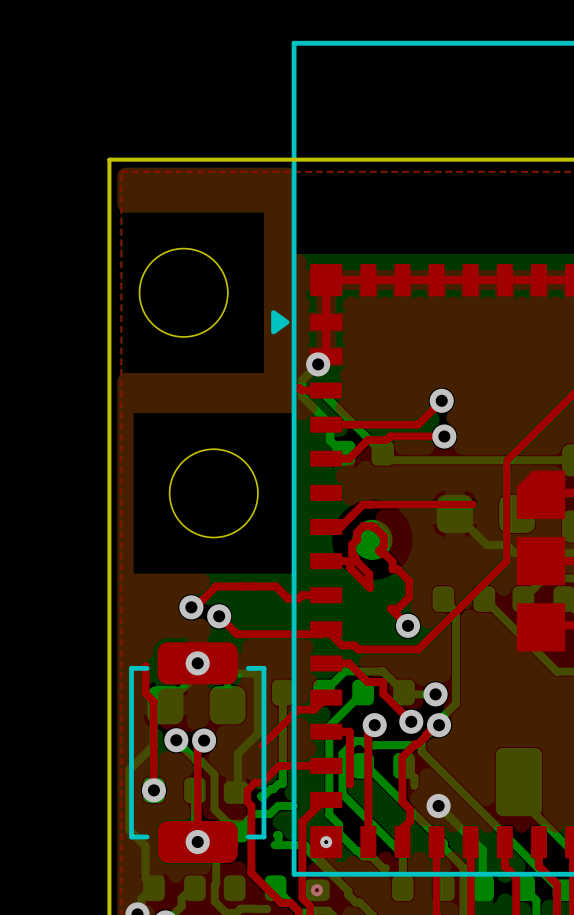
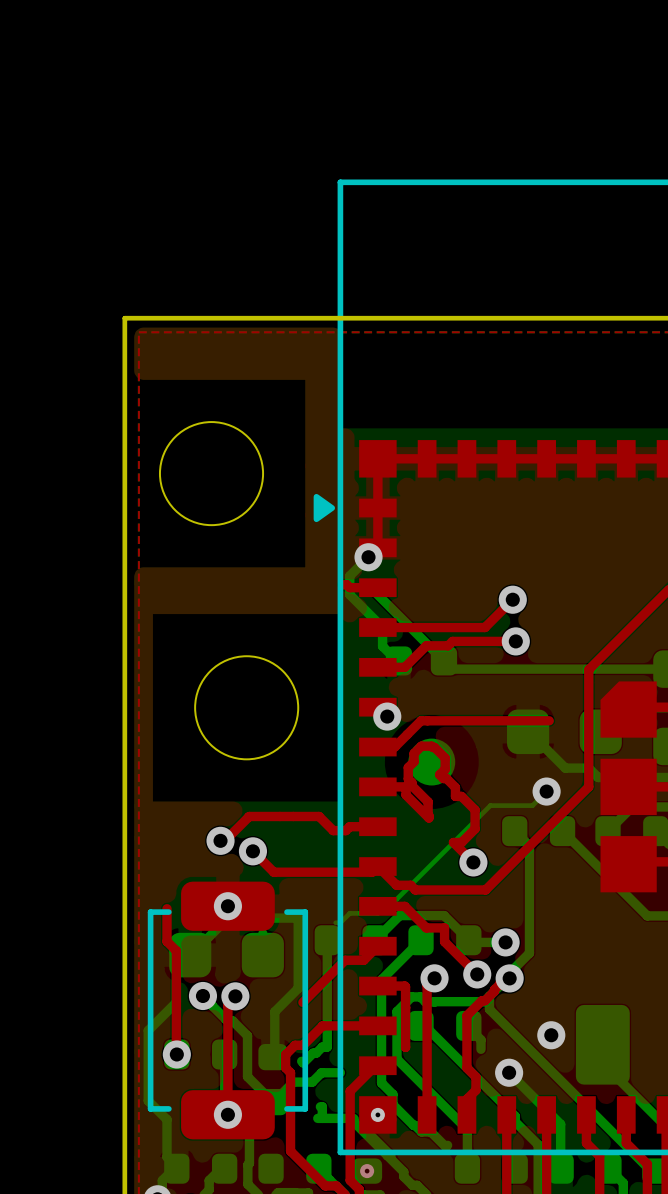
via: none -> (387, 716)
bottom track: none -> (546, 791) (532, 805) (490, 805) (396, 899) (391, 899) (377, 913) (349, 913) (340, 922) (335, 922)
via: none -> (546, 791)
via: none -> (551, 1035)

